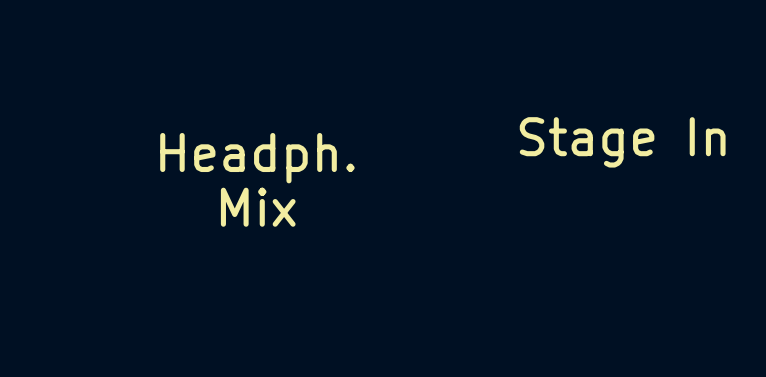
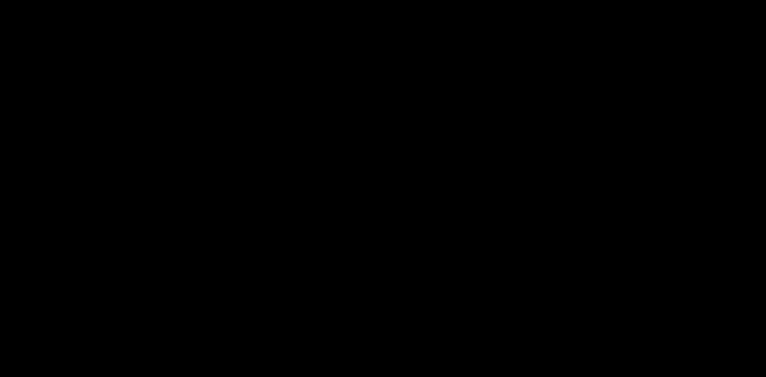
text: Stage In (622, 142) -> none
text: Headph. (257, 158) -> none
text: Mix (258, 207) -> none

